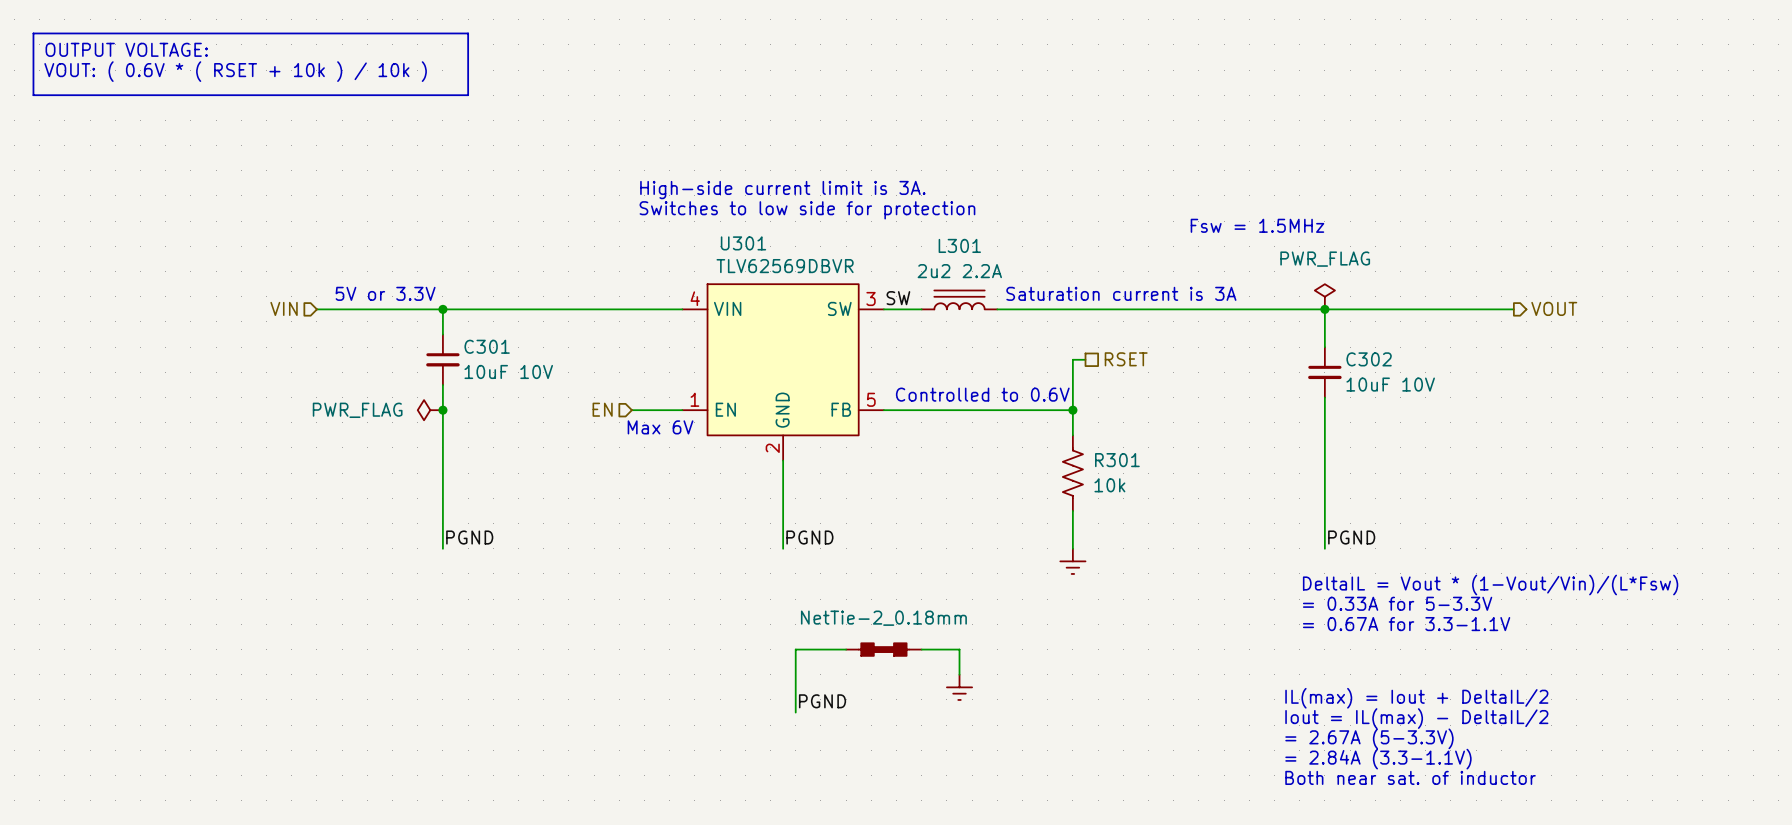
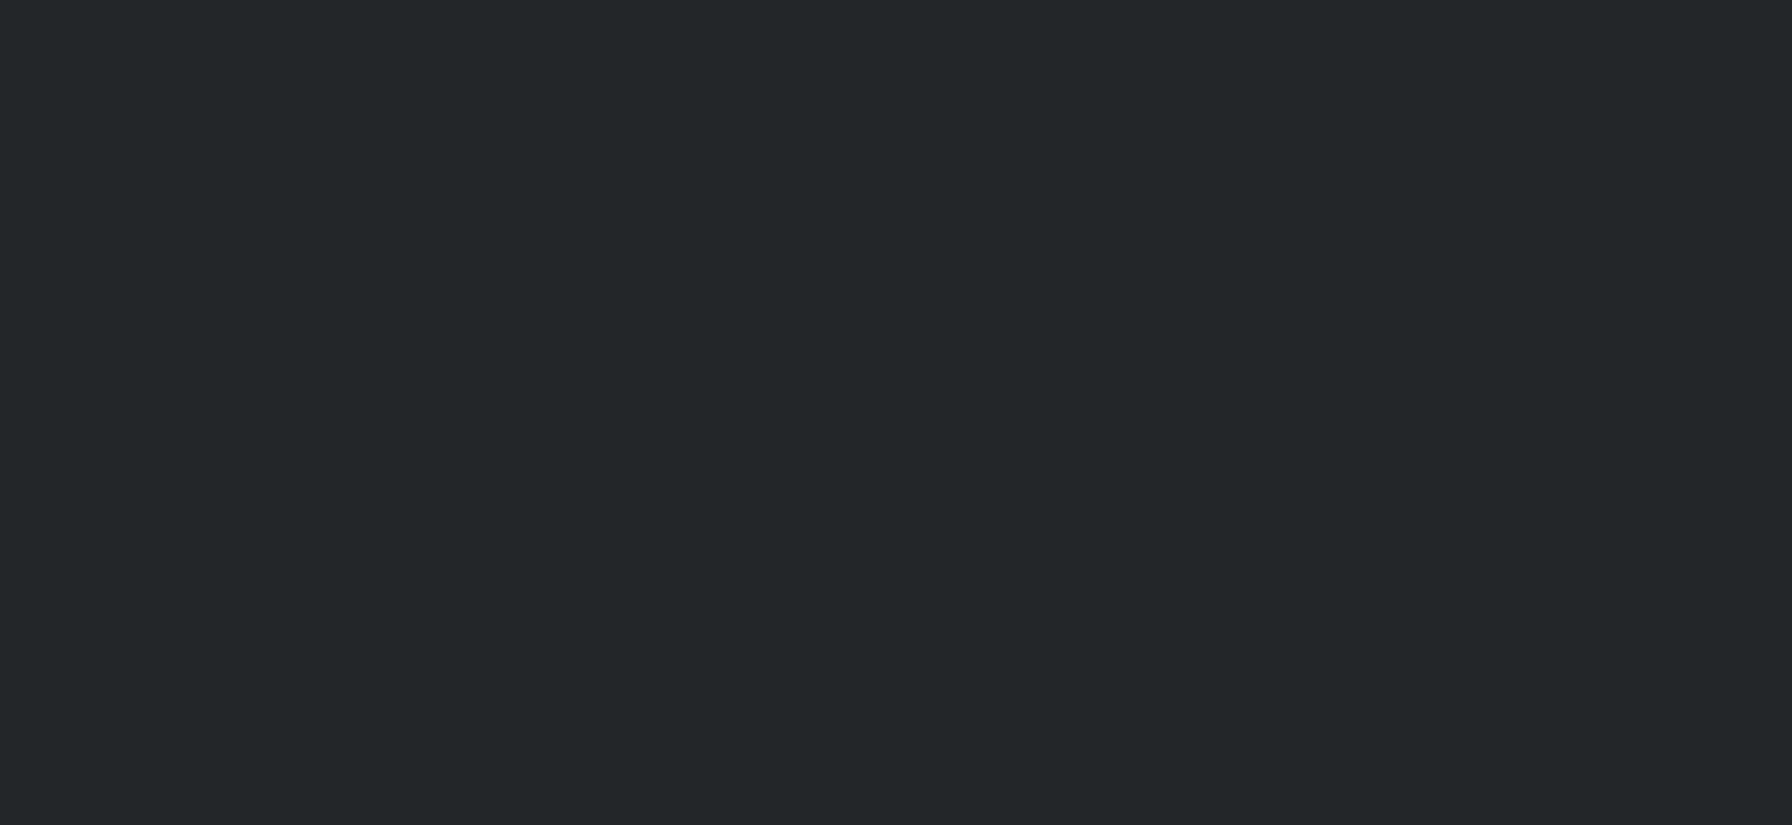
line: (33, 33) (468, 33) (468, 95) (33, 95) (33, 33) -> none
text: OUTPUT VOLTAGE: (126, 49) -> none
text: VOUT: ( 0.6V * ( RSET + 10k ) / 10k ) (235, 71) -> none
text: High-side current limit is 3A. (782, 190) -> none
text: Switches to low side for protection (807, 210) -> none
text: Fsw = 1.5MHz (1257, 225) -> none
text: 5V or 3.3V (385, 293) -> none
text: Saturation current is 3A (1121, 293) -> none
power symbol: PWR_FLAG (1324, 296) -> none
label: SW (898, 298) -> none
L301: 2u2 2.2A (959, 299) -> none
hierarchical label: VIN (284, 308) -> none
hierarchical label: VOUT (1554, 308) -> none
wire: (316, 309) (682, 309) -> none
wire: (442, 309) (442, 334) -> none
junction: (442, 309) -> none
wire: (883, 309) (921, 309) -> none
wire: (997, 309) (1513, 309) -> none
wire: (1324, 309) (1324, 347) -> none
junction: (1324, 309) -> none
C301: 10uF 10V (442, 359) -> none
wire: (1085, 359) (1072, 359) (1072, 435) -> none
hierarchical label: RSET (1126, 359) -> none
U301: TLV62569DBVR (783, 372) -> none
C302: 10uF 10V (1324, 372) -> none
wire: (442, 384) (442, 548) -> none
text: Controlled to 0.6V (982, 394) -> none
wire: (1324, 397) (1324, 548) -> none
hierarchical label: EN (602, 409) -> none
power symbol: PWR_FLAG (430, 410) -> none
junction: (442, 410) -> none
wire: (631, 410) (682, 410) -> none
wire: (883, 410) (1072, 410) -> none
junction: (1072, 410) -> none
text: Max 6V (660, 427) -> none
wire: (783, 460) (783, 548) -> none
R301: 10k (1072, 473) -> none
wire: (1072, 510) (1072, 548) -> none
label: PGND (469, 537) -> none
label: PGND (809, 537) -> none
label: PGND (1351, 537) -> none
power symbol: (1072, 561) -> none
text: DeltaIL = Vout * (1-Vout/Vin)/(L*Fsw) (1490, 584) -> none
text: = 0.33A for 5-3.3V (1397, 603) -> none
text: = 0.67A for 3.3-1.1V (1406, 624) -> none
wire: (846, 649) (795, 649) (795, 712) -> none
part: NetTie-2_0.18mm (883, 649) -> none
wire: (921, 649) (959, 649) (959, 674) -> none
power symbol: (959, 687) -> none
text: IL(max) = Iout + DeltaIL/2 (1416, 698) -> none
label: PGND (822, 701) -> none
text: Iout = IL(max) - DeltaIL/2 (1416, 718) -> none
text: = 2.67A (5-3.3V) (1369, 738) -> none
text: = 2.84A (3.3-1.1V) (1378, 759) -> none
text: Both near sat. of inductor (1410, 777) -> none

